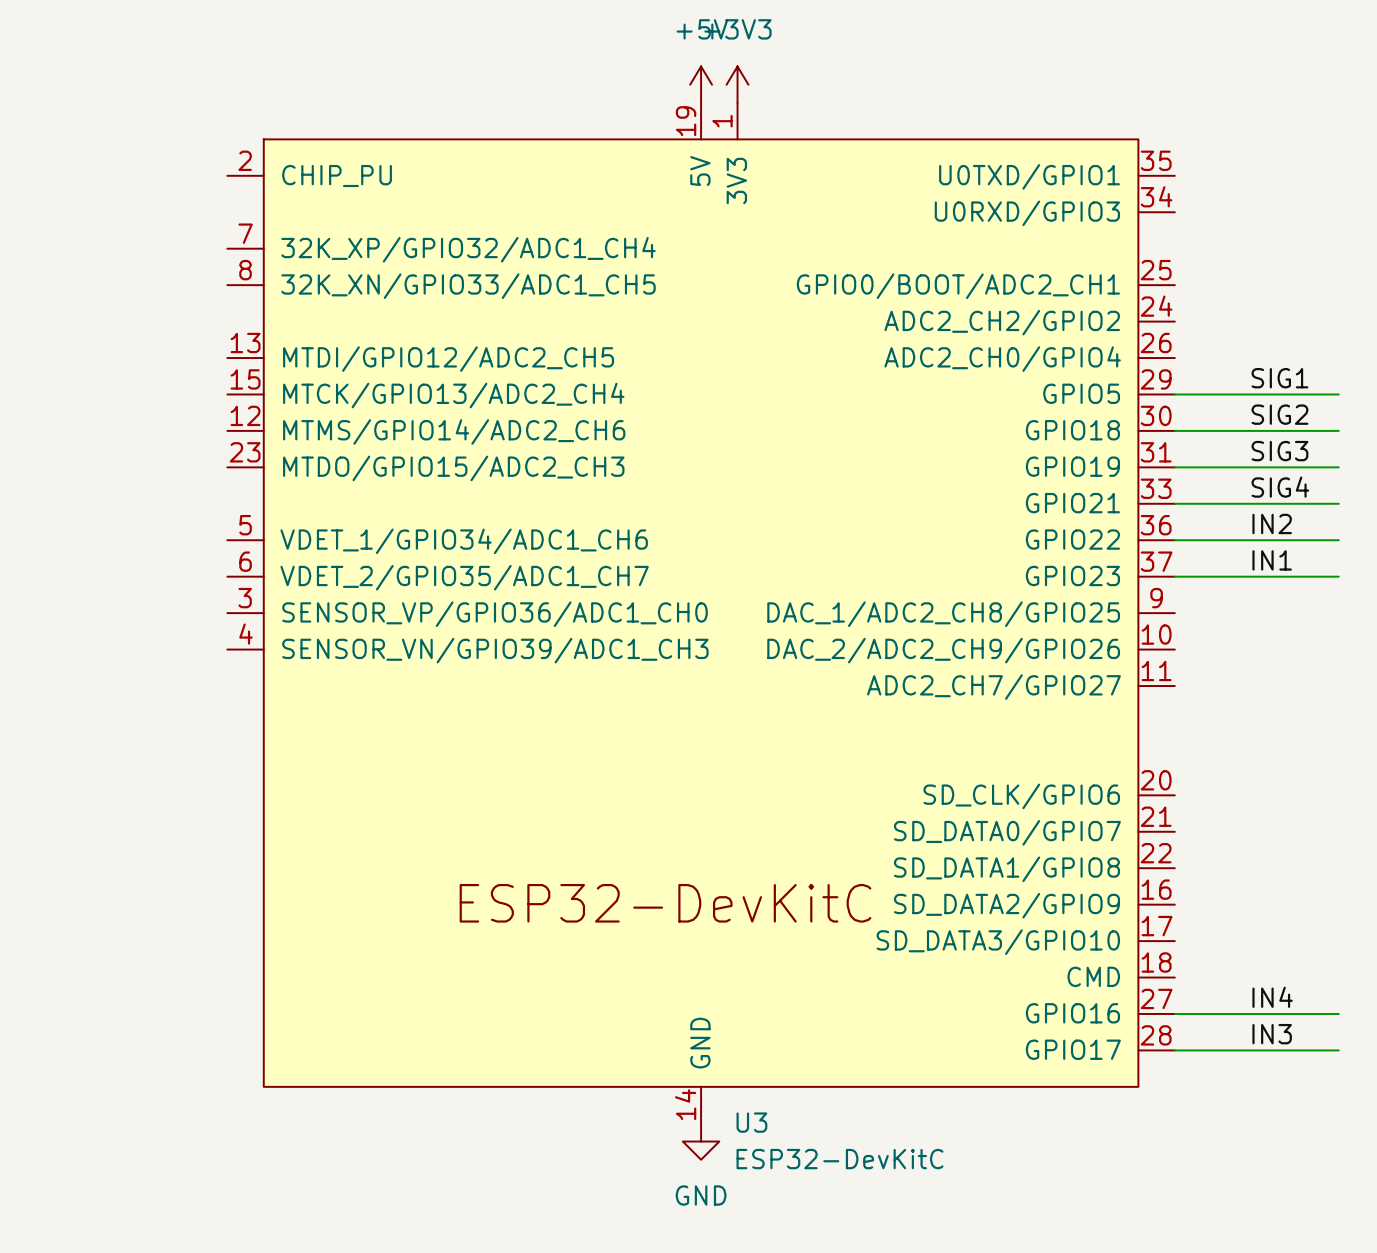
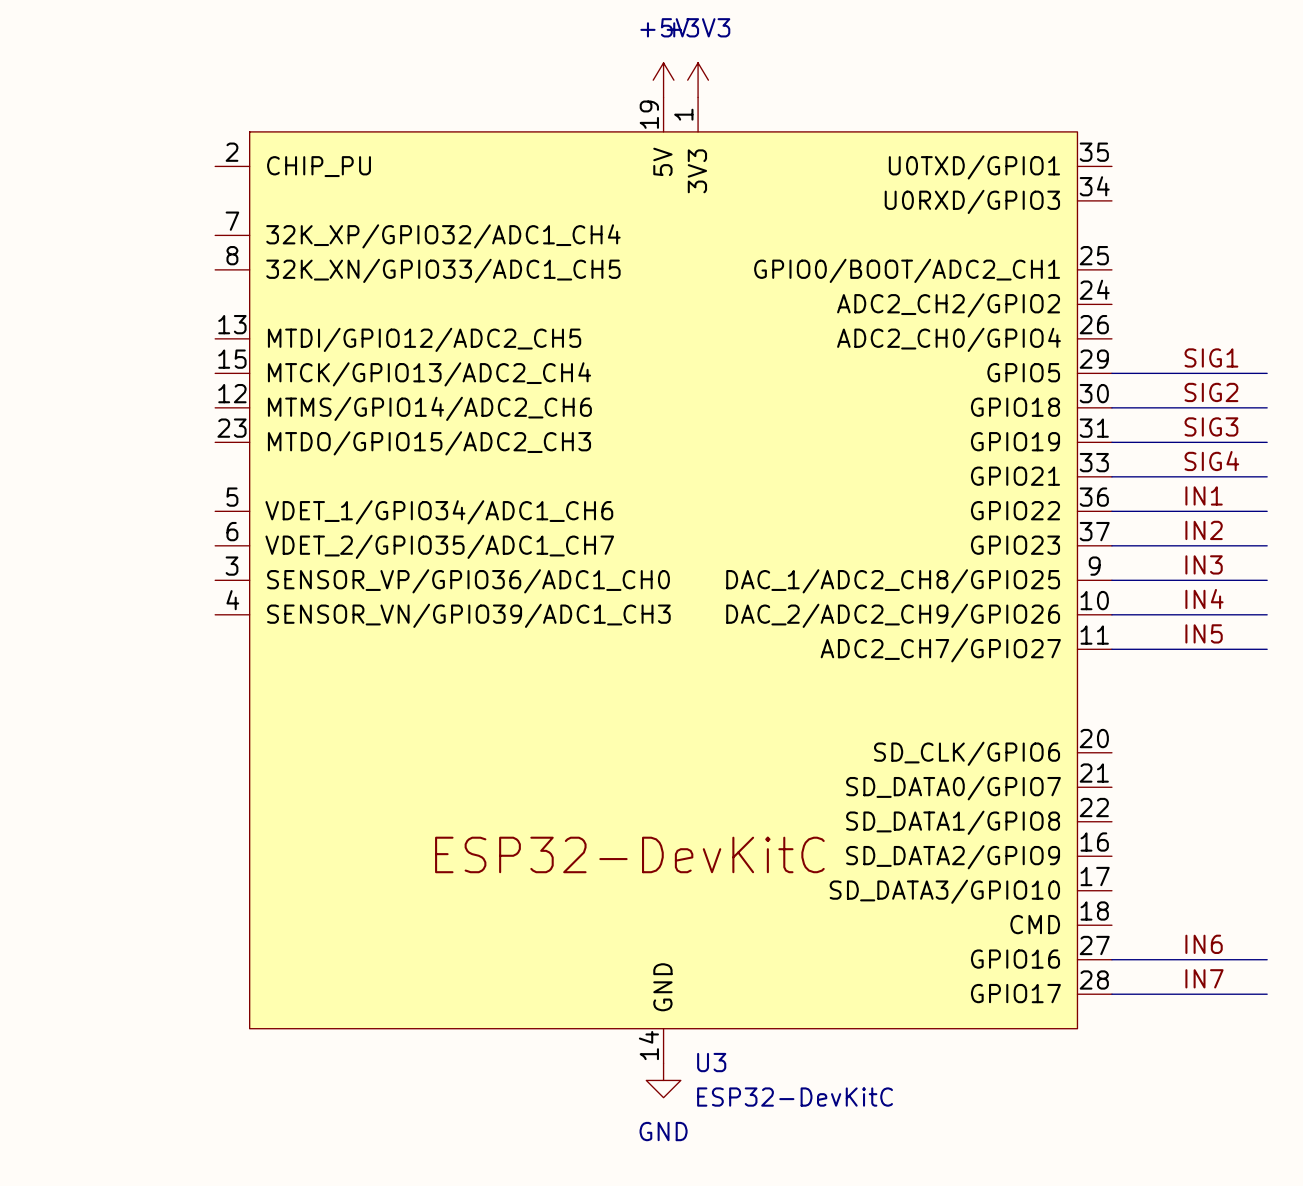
label: IN2 (1272, 523) -> IN1 (1204, 495)
label: IN1 (1272, 560) -> IN2 (1204, 530)
label: none -> IN3 (1204, 564)
wire: none -> (1111, 580) (1267, 580)
label: none -> IN4 (1204, 599)
wire: none -> (1111, 614) (1267, 614)
label: none -> IN5 (1204, 633)
wire: none -> (1111, 649) (1267, 649)
label: IN4 (1272, 997) -> IN6 (1204, 944)
label: IN3 (1272, 1034) -> IN7 (1204, 978)

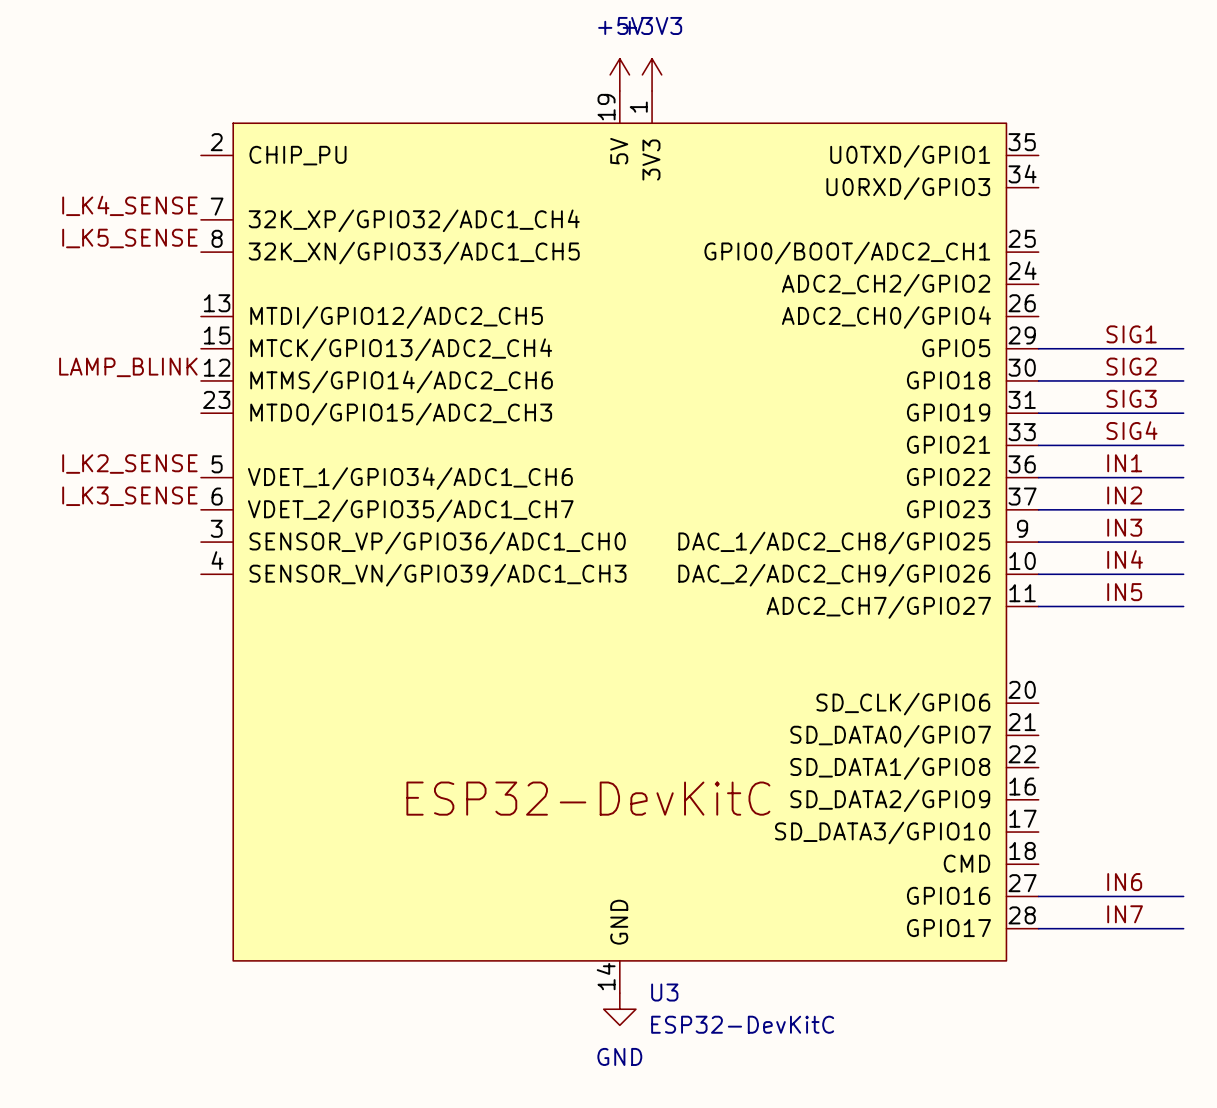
label: none -> I_K4_SENSE (129, 205)
label: none -> I_K5_SENSE (129, 238)
label: none -> LAMP_BLINK (128, 367)
label: none -> I_K2_SENSE (129, 464)
label: none -> I_K3_SENSE (129, 496)

